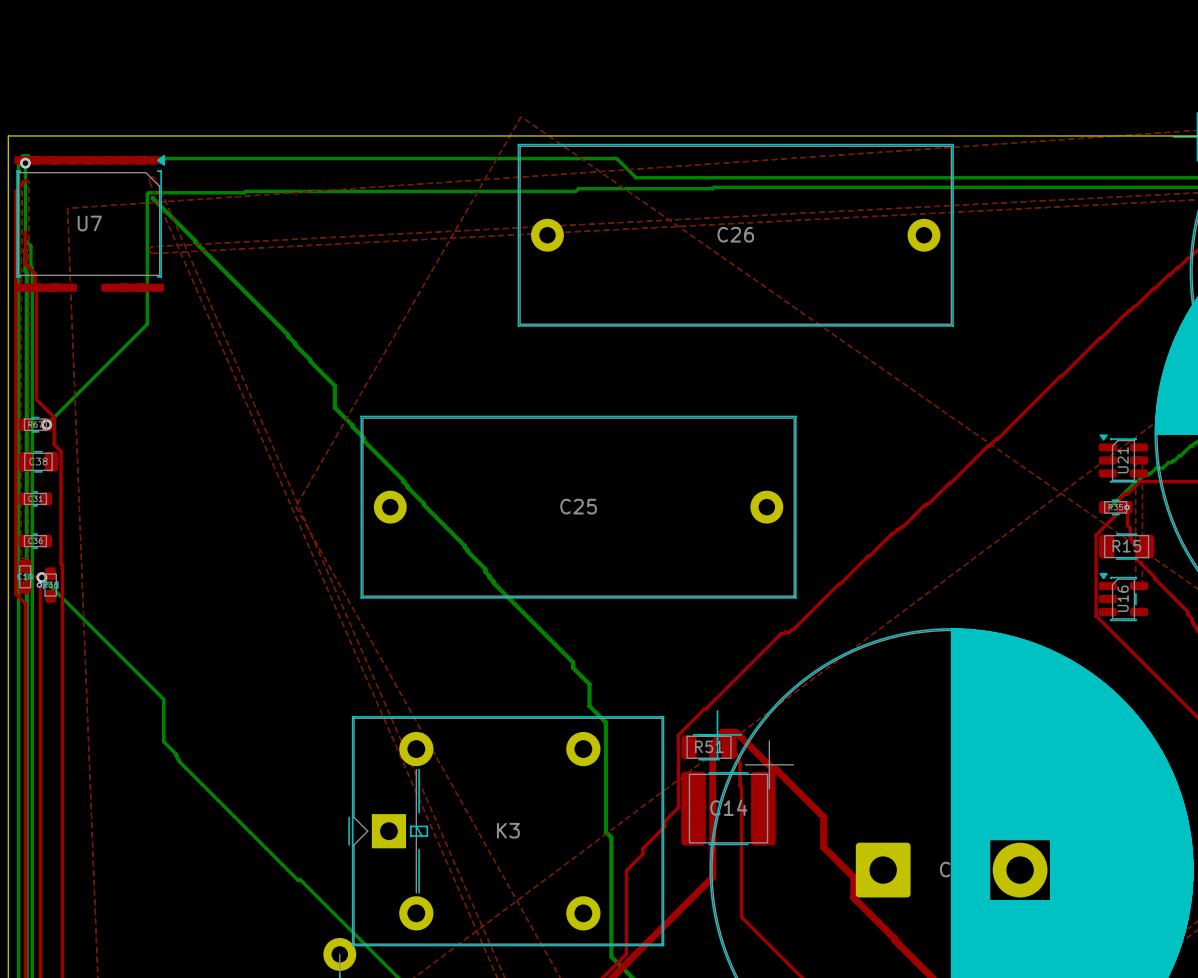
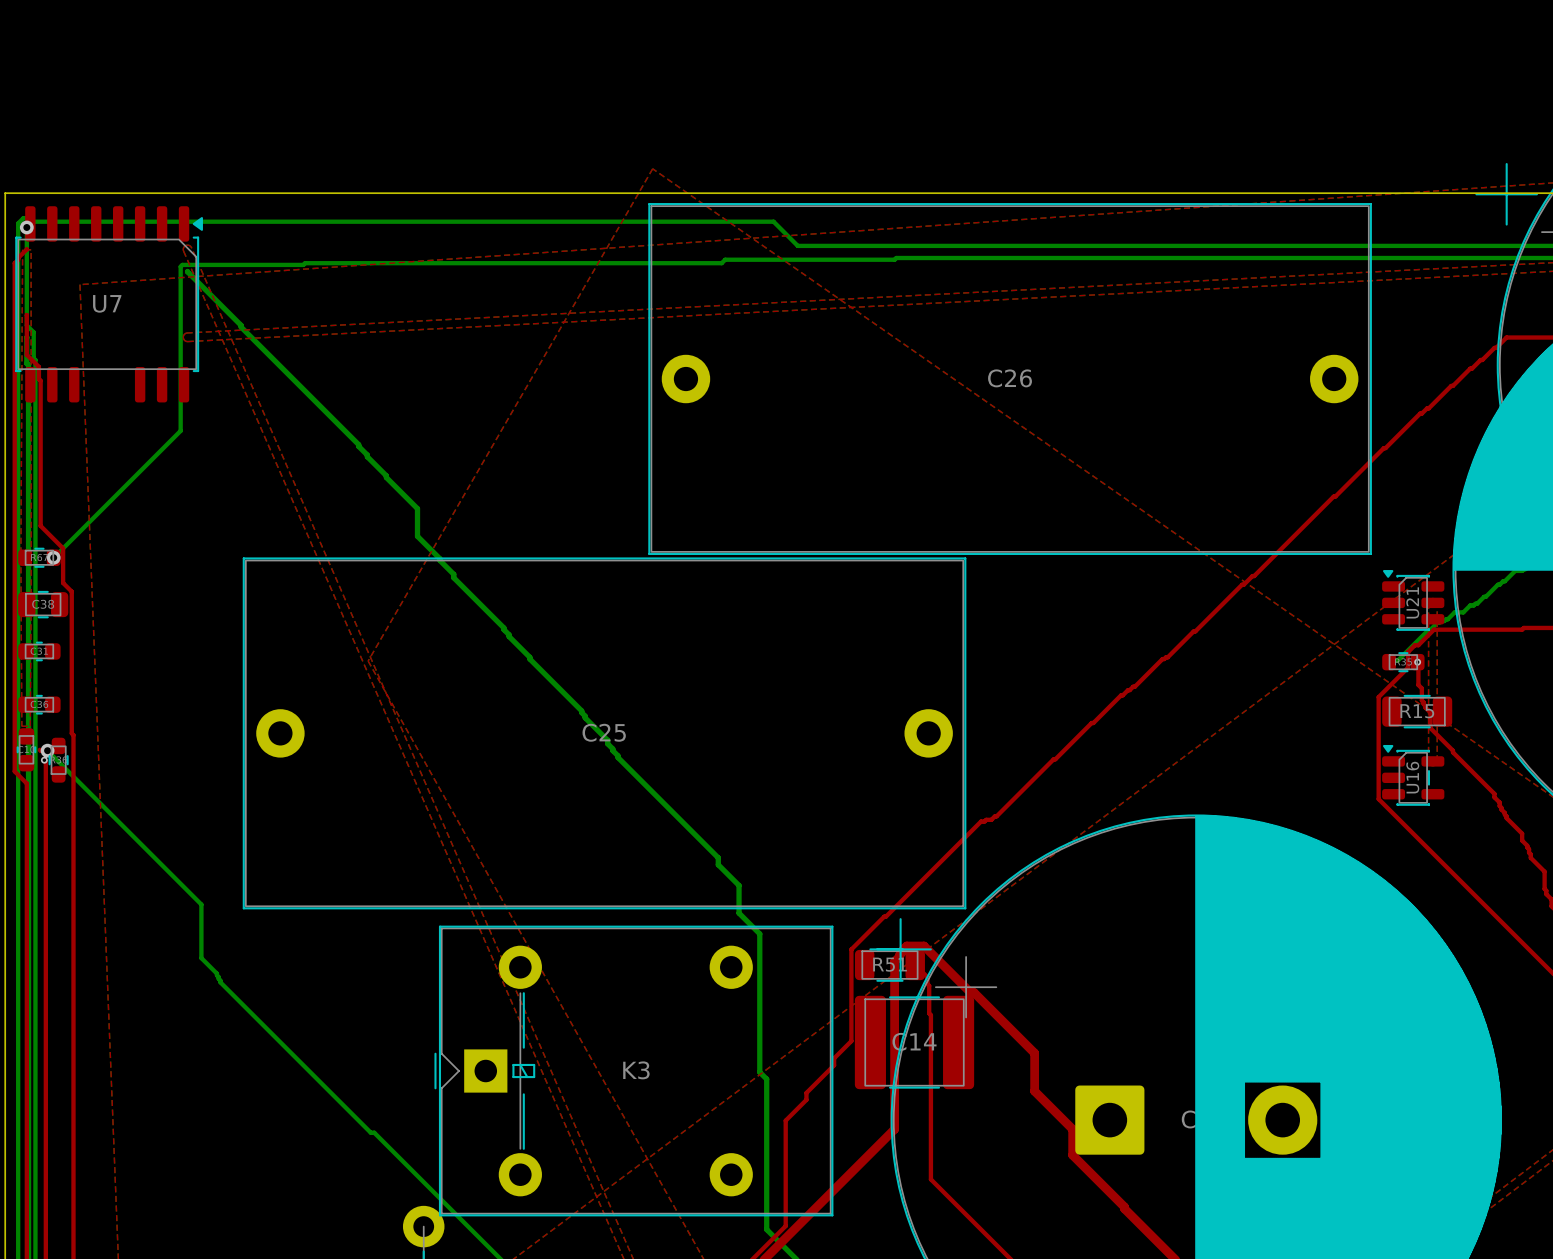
C26 footprint: [517, 143, 954, 327] -> [648, 203, 1372, 555]
U7 footprint: [14, 154, 165, 292] -> [15, 206, 203, 403]
C25 footprint: [360, 415, 797, 599] -> [242, 557, 967, 910]

